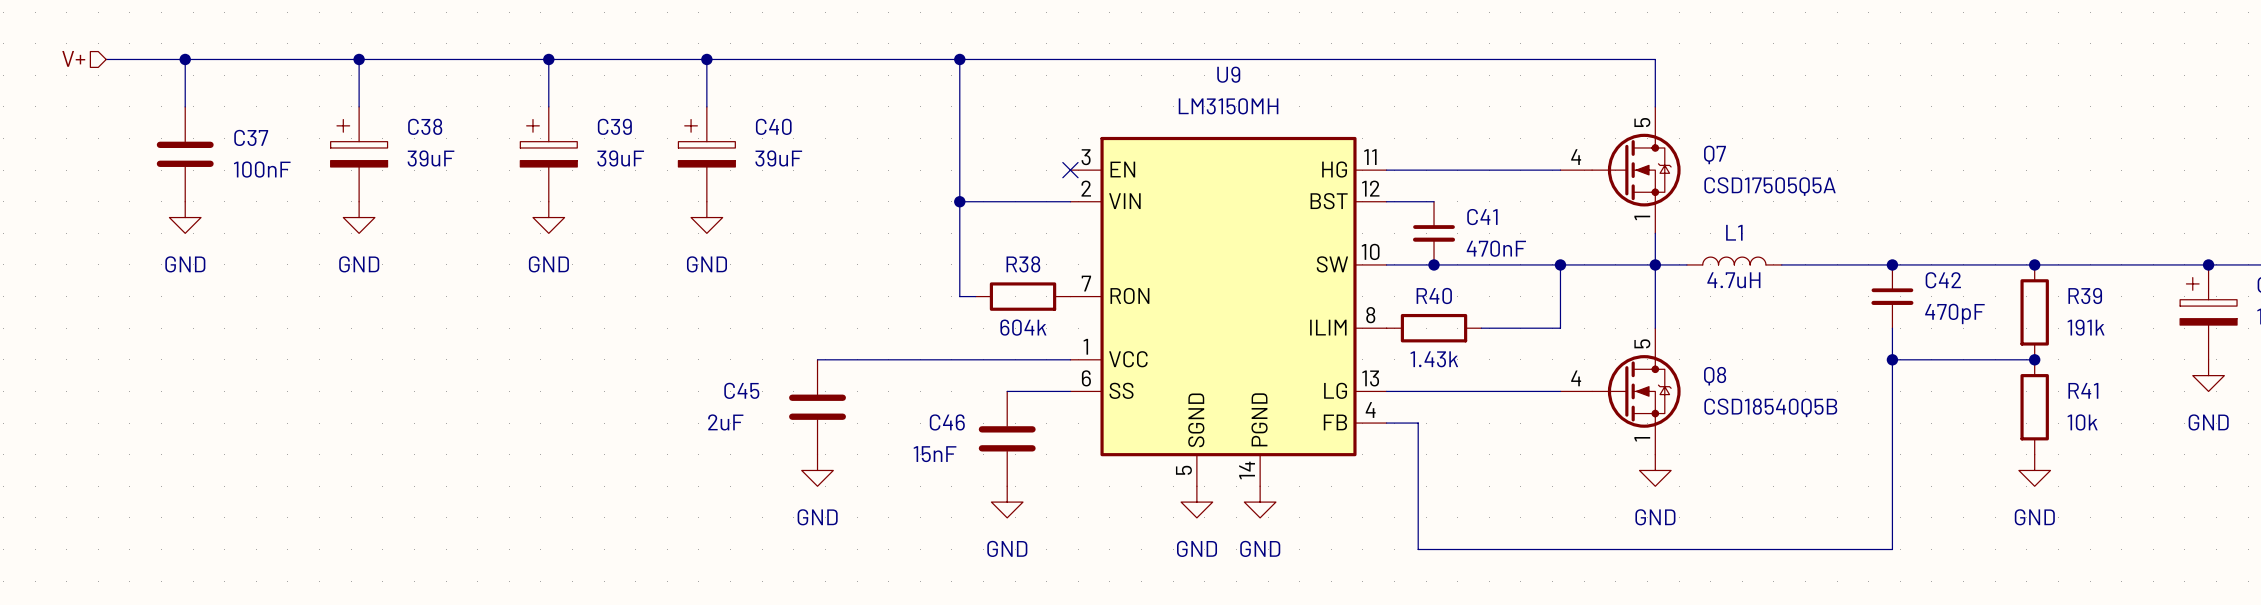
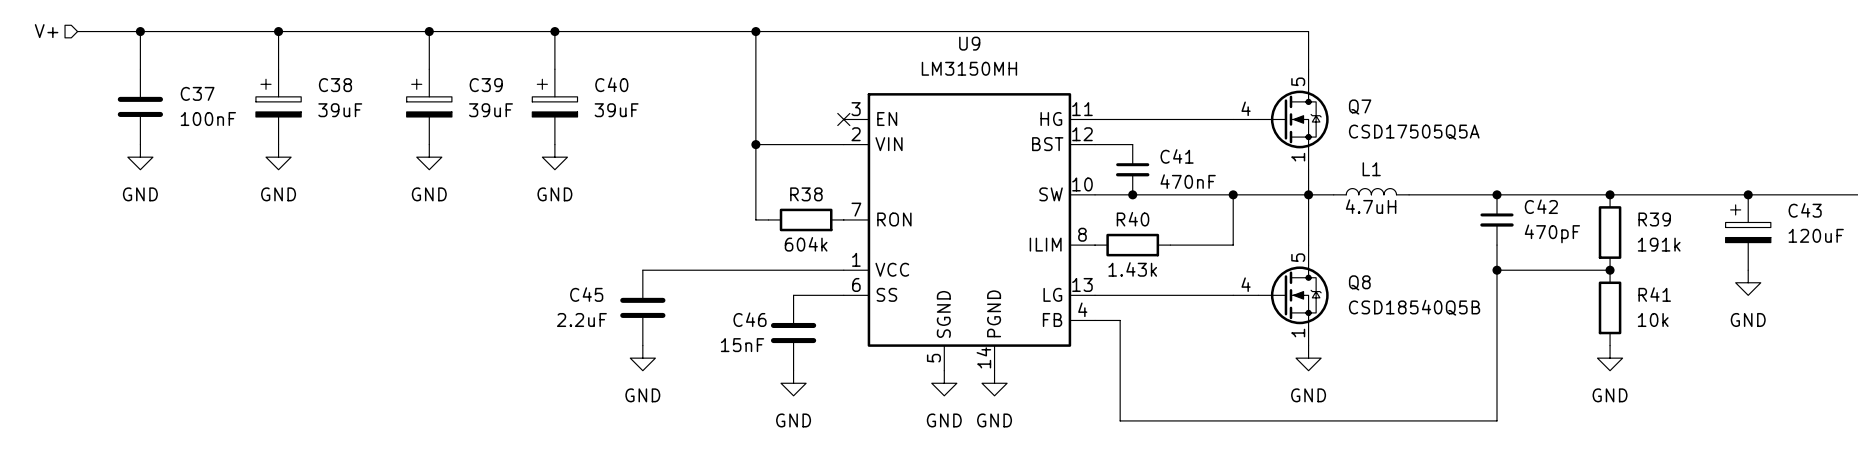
C45 value: 2uF (725, 422) -> 2.2uF (581, 319)

